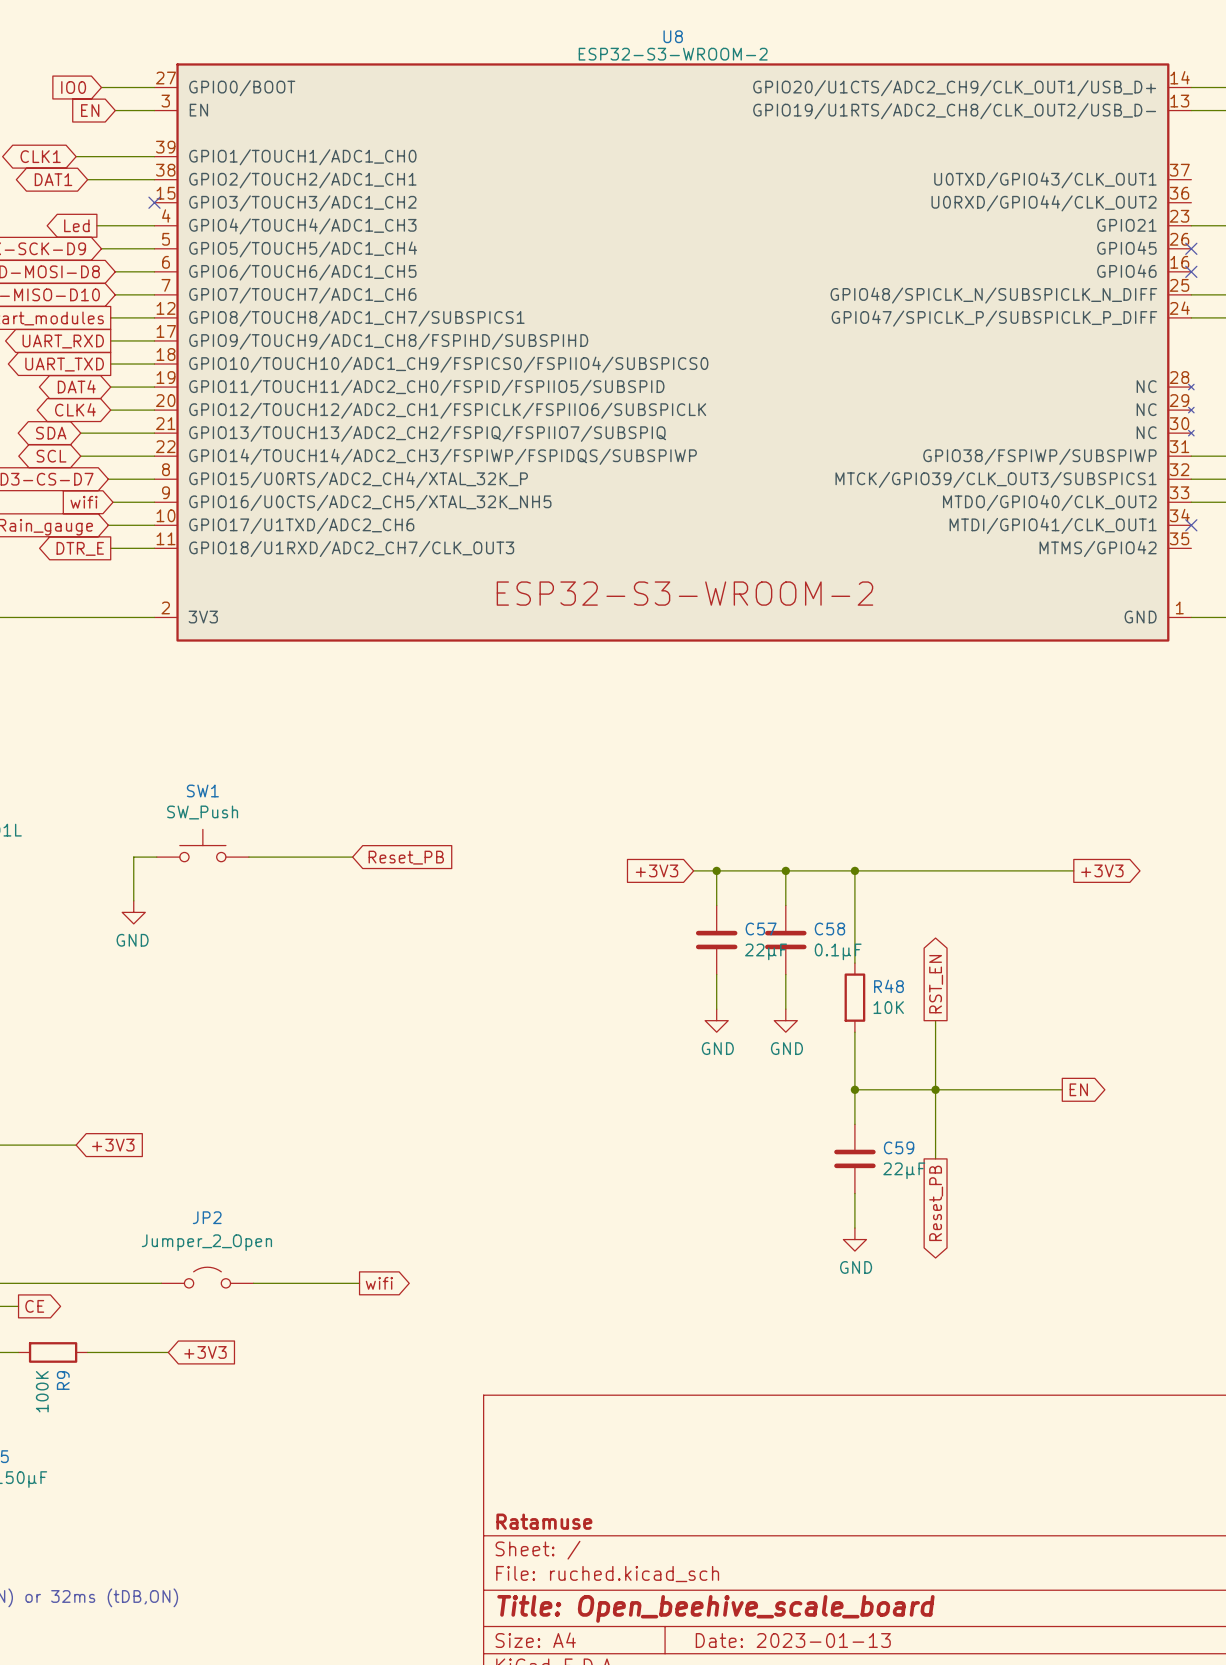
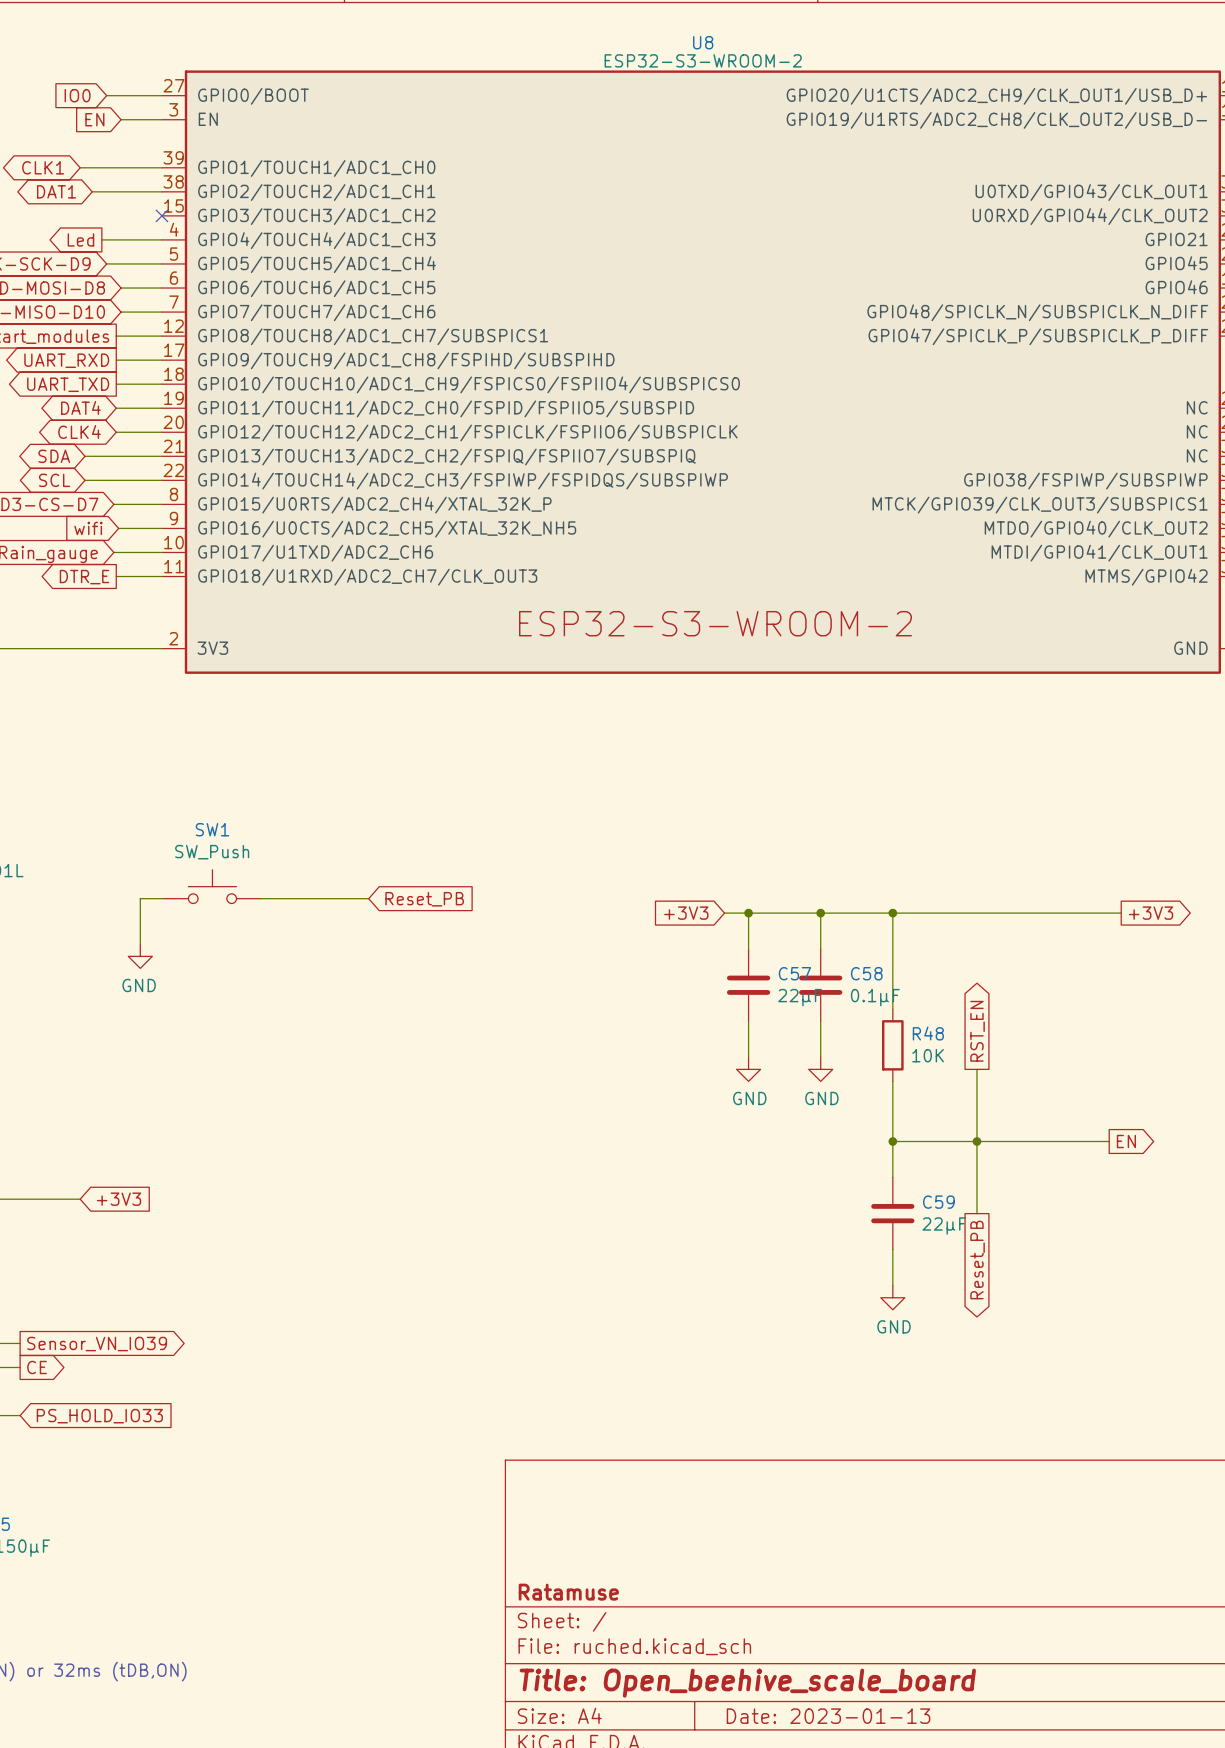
JP2: Jumper_2_Open (207, 1277) -> none
wire: (18, 1283) (161, 1283) -> none
global label: none -> Sensor_VN_IO39 (97, 1344)
wire: (253, 1283) (359, 1283) -> none
global label: wifi (379, 1283) -> none
R9: 100K (53, 1352) -> none
wire: (87, 1352) (168, 1352) -> none
global label: +3V3 (205, 1352) -> none
global label: none -> PS_HOLD_IO33 (99, 1416)

